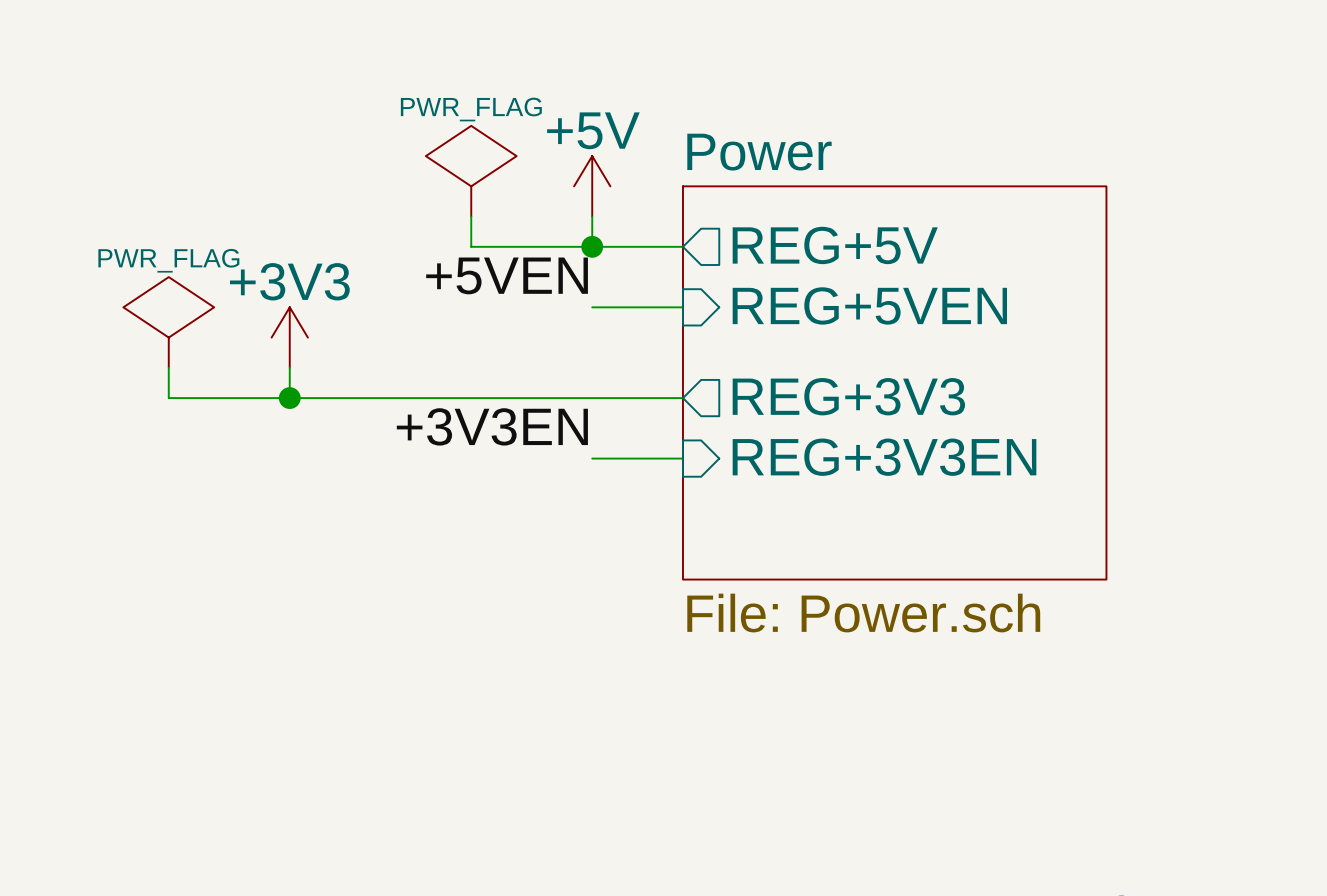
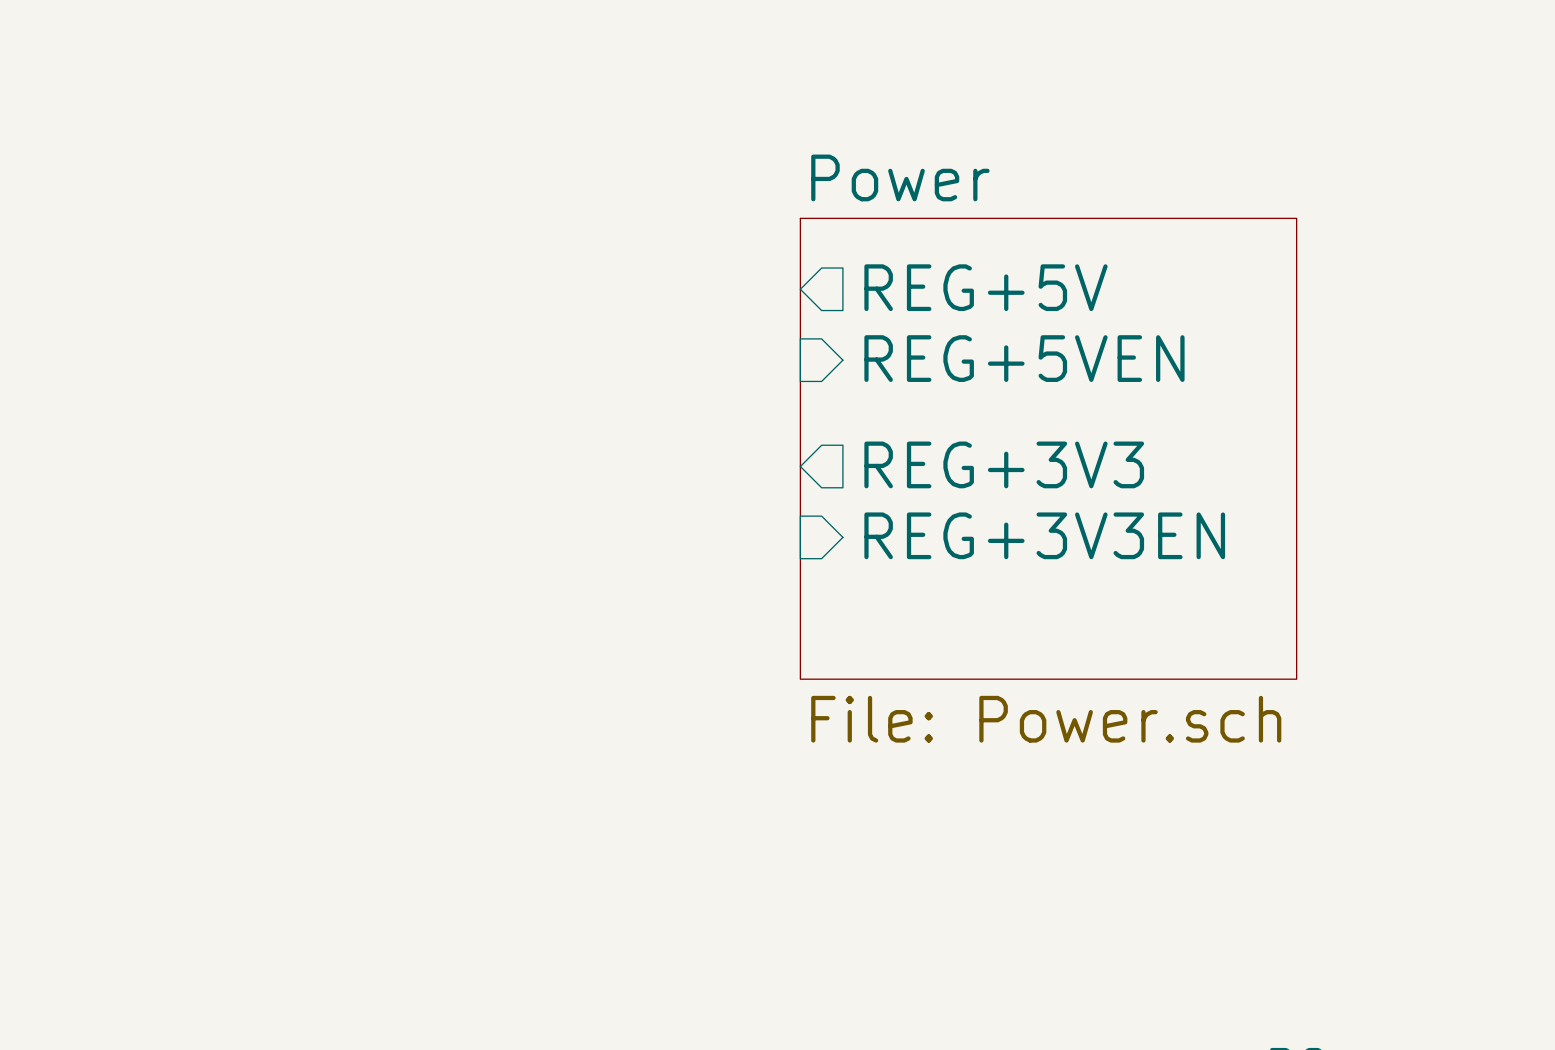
power symbol: PWR_FLAG (471, 171) -> none
power symbol: +5V (592, 186) -> none
wire: (471, 216) (471, 246) (682, 246) -> none
wire: (592, 216) (592, 246) -> none
junction: (592, 246) -> none
label: +5VEN (507, 275) -> none
wire: (592, 307) (682, 307) -> none
power symbol: PWR_FLAG (168, 322) -> none
power symbol: +3V3 (289, 337) -> none
wire: (168, 367) (168, 398) (682, 398) -> none
wire: (289, 367) (289, 398) -> none
junction: (289, 398) -> none
label: +3V3EN (492, 426) -> none
wire: (592, 458) (682, 458) -> none

